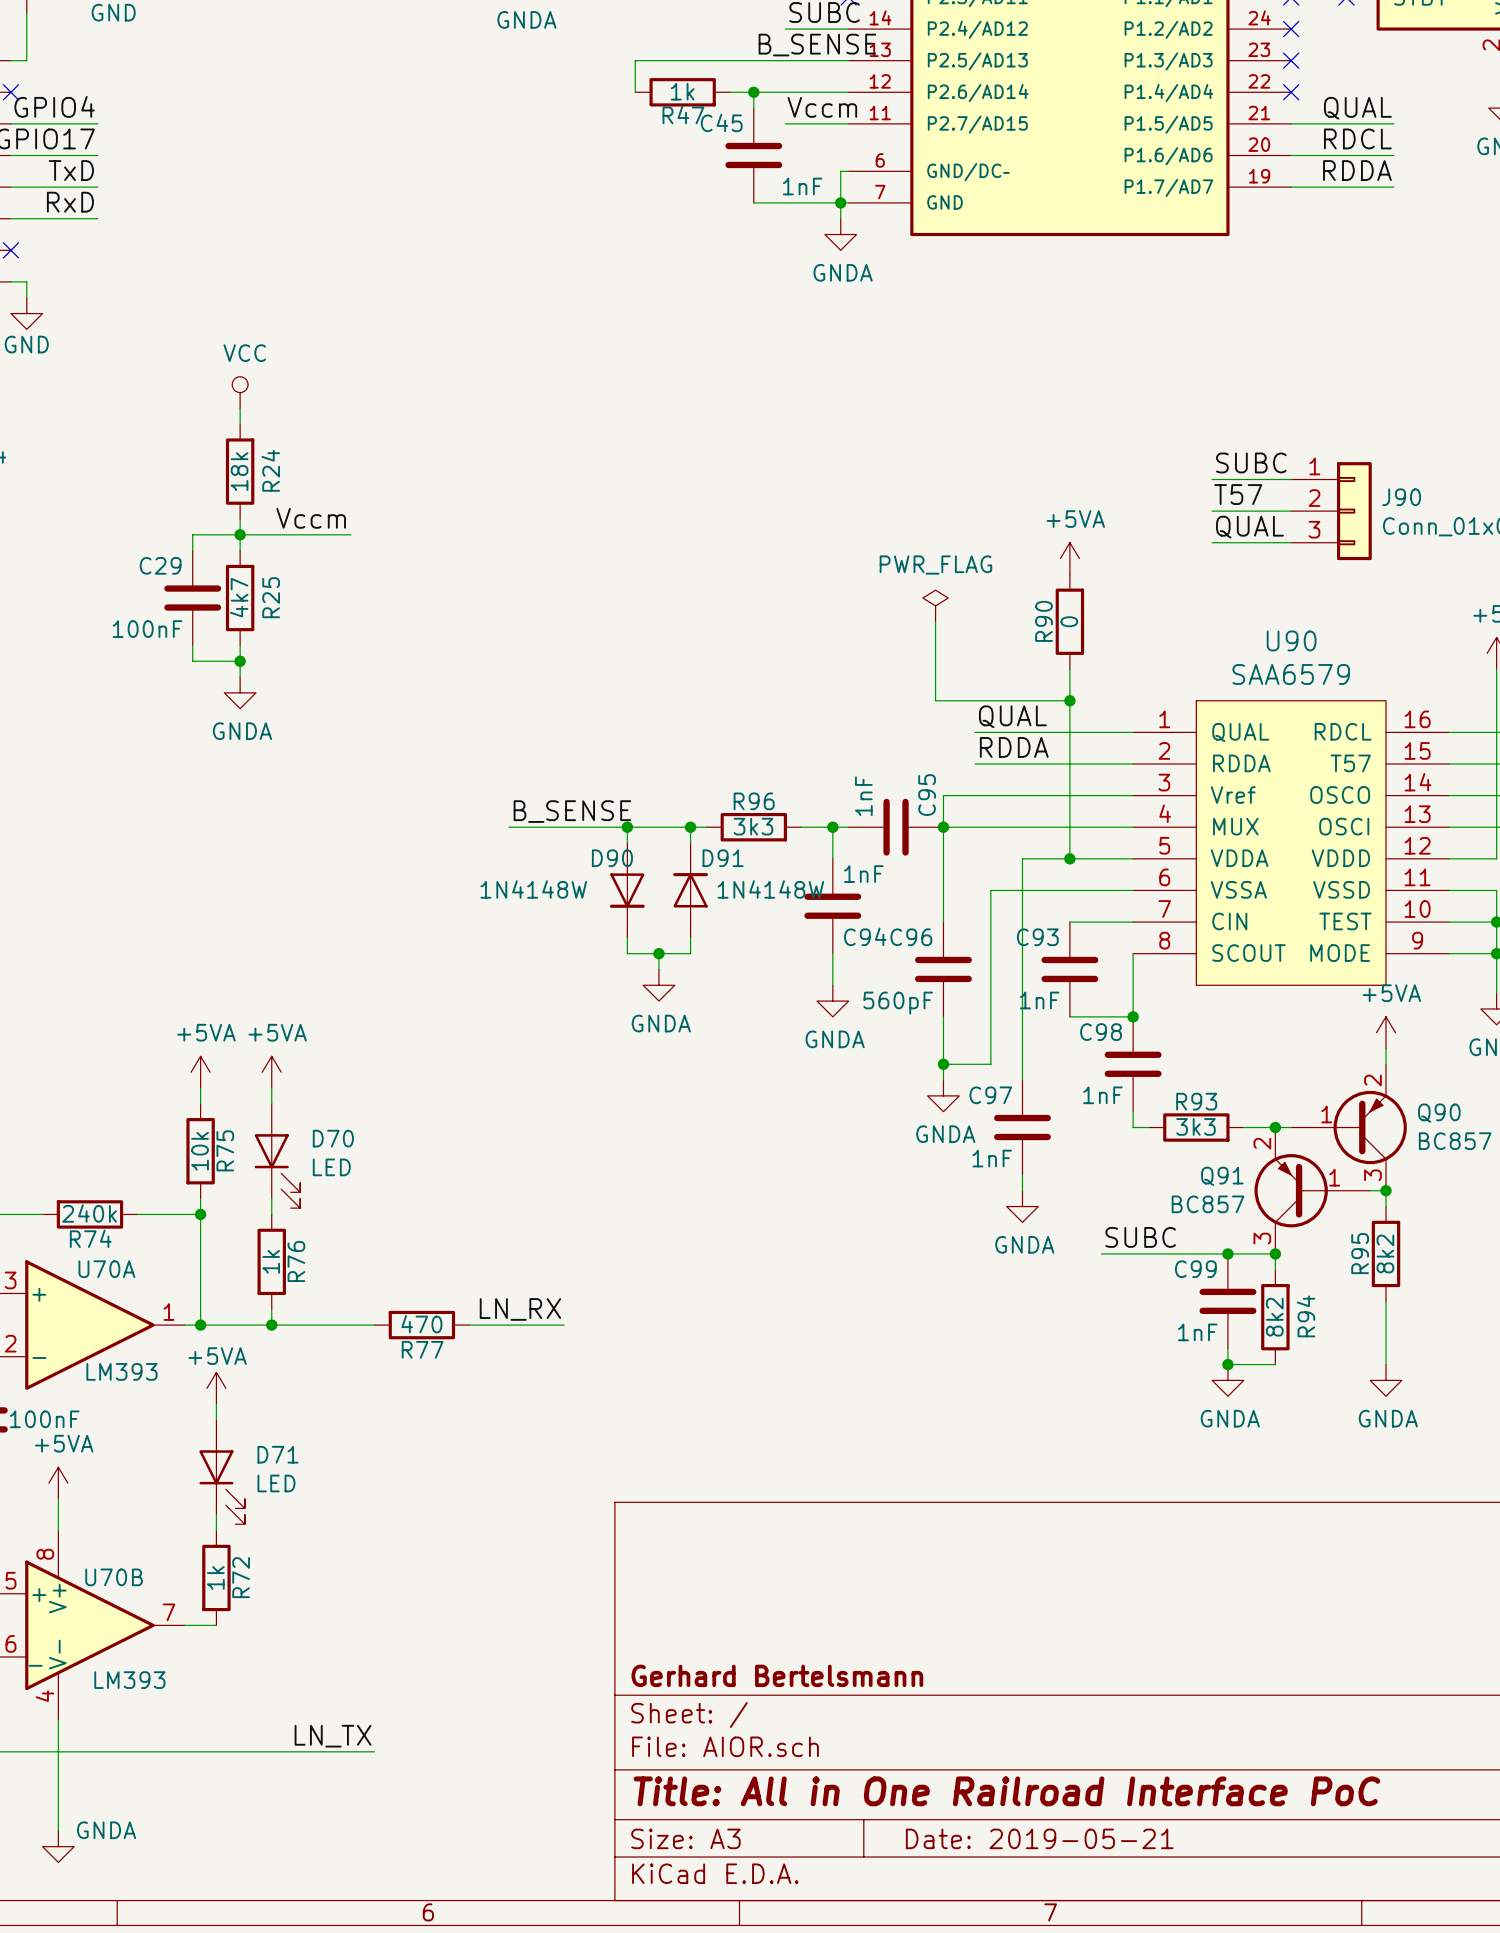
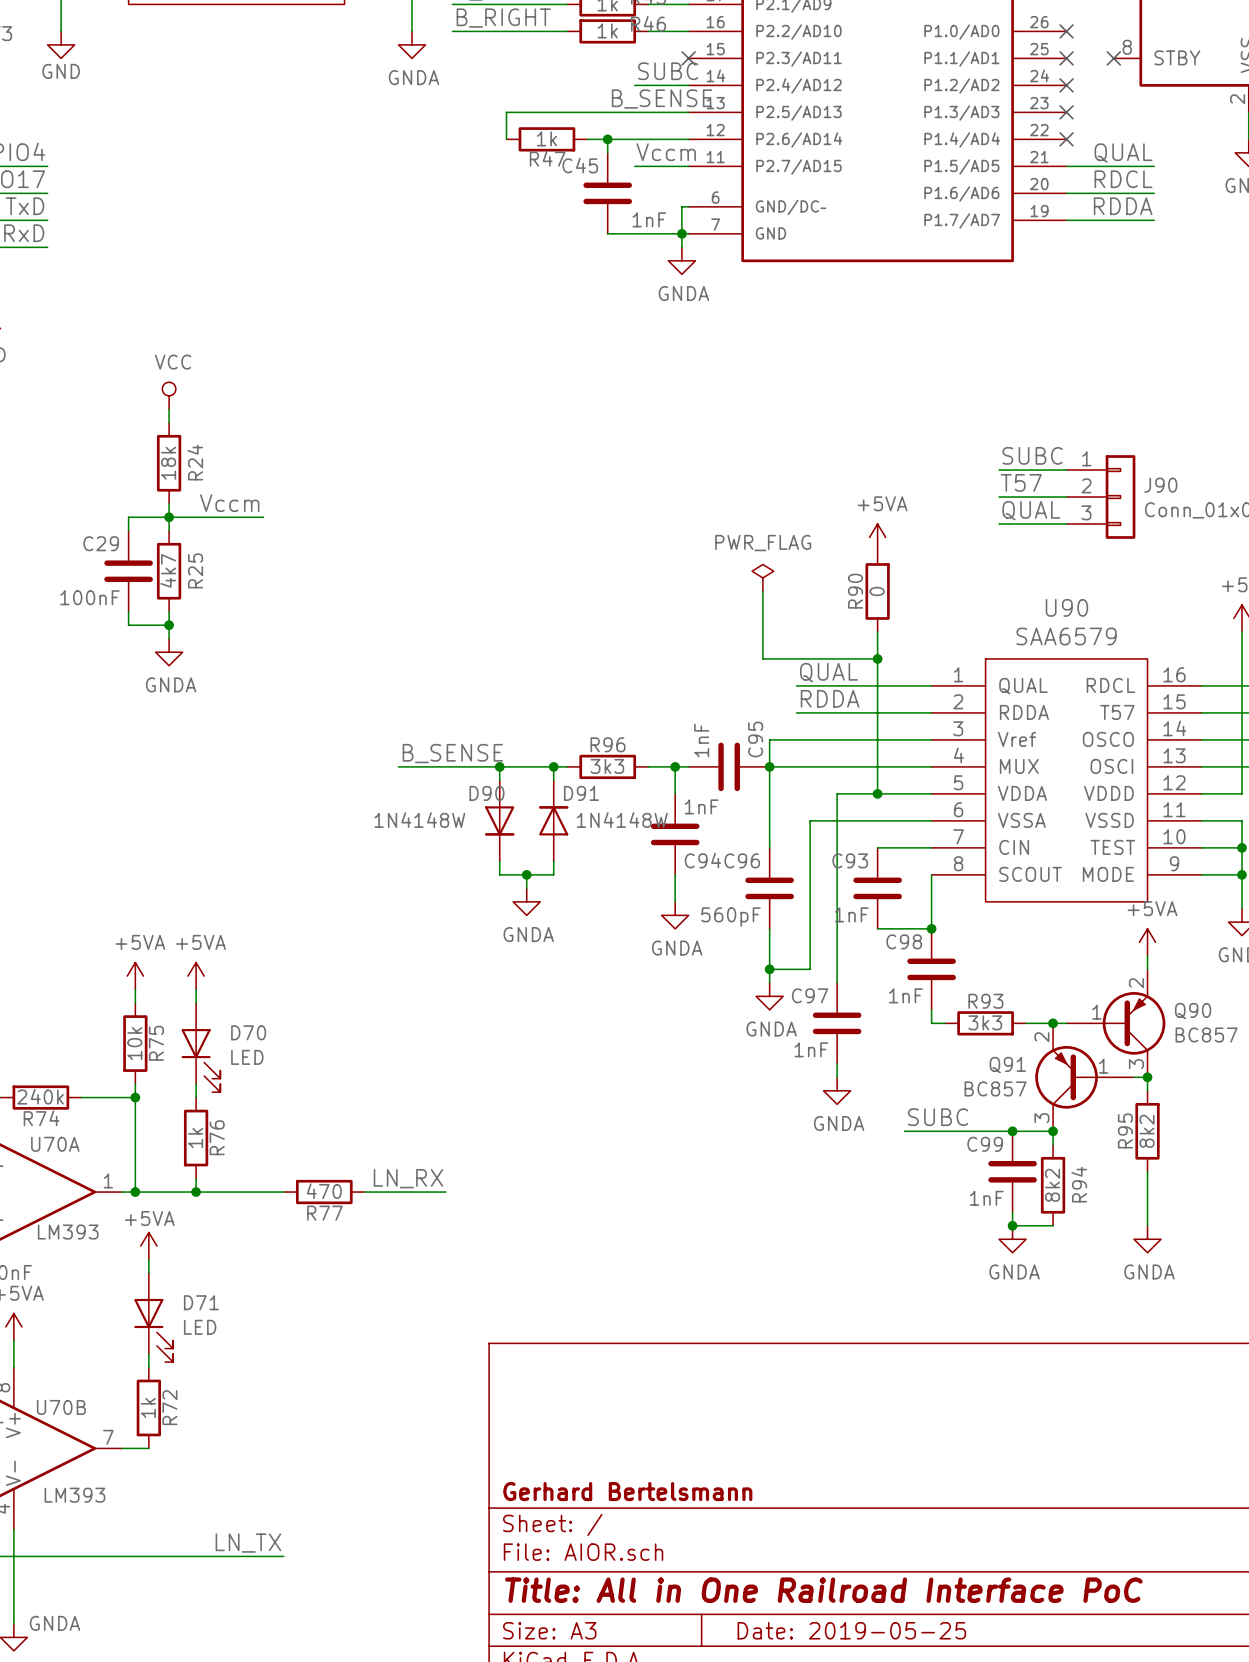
title block: Date: 2019-05-21 (1039, 1838) -> Date: 2019-05-25 (851, 1630)

